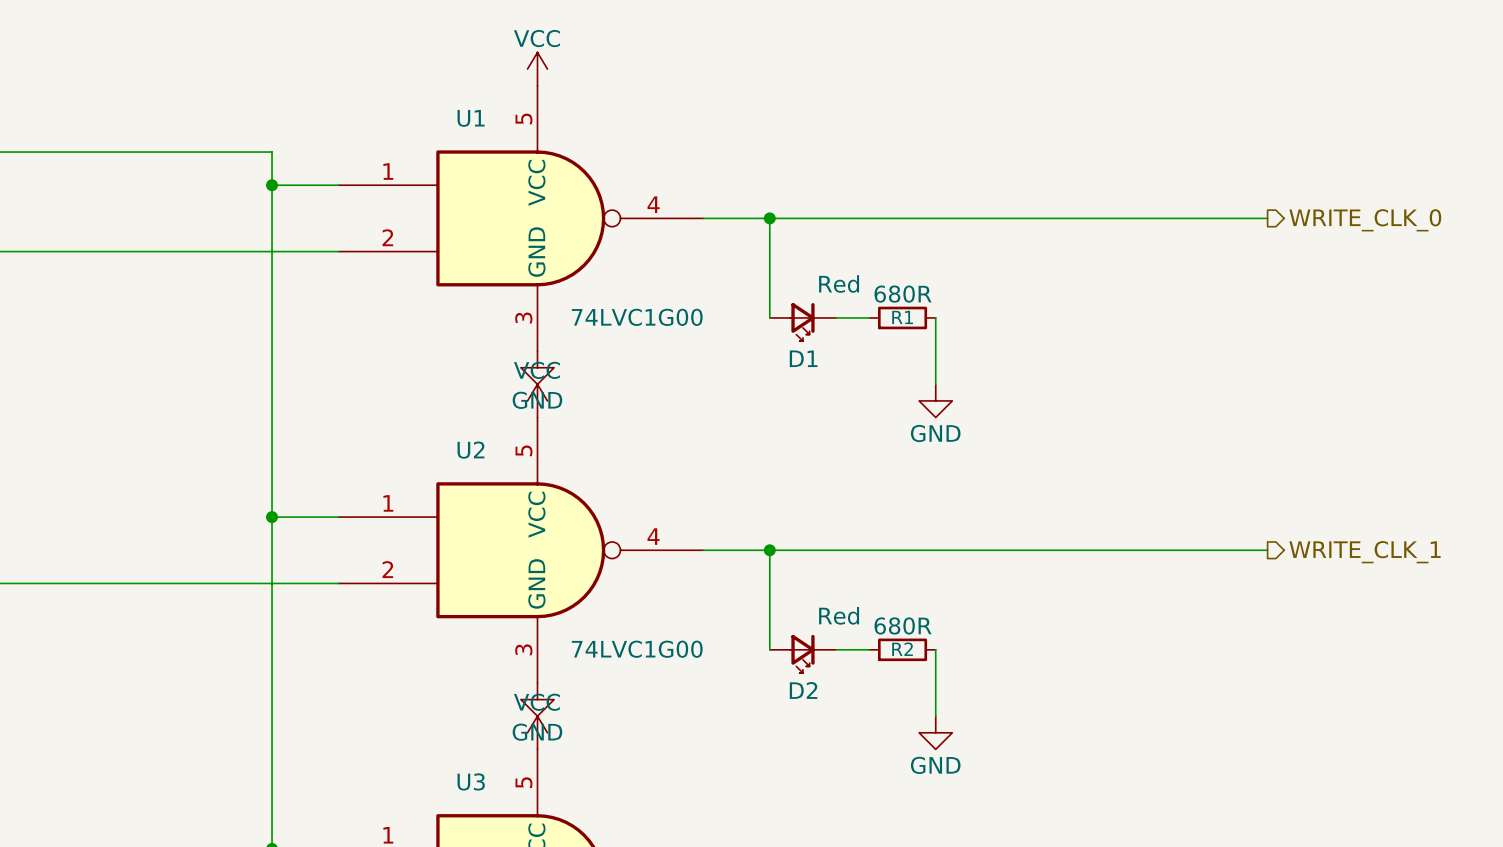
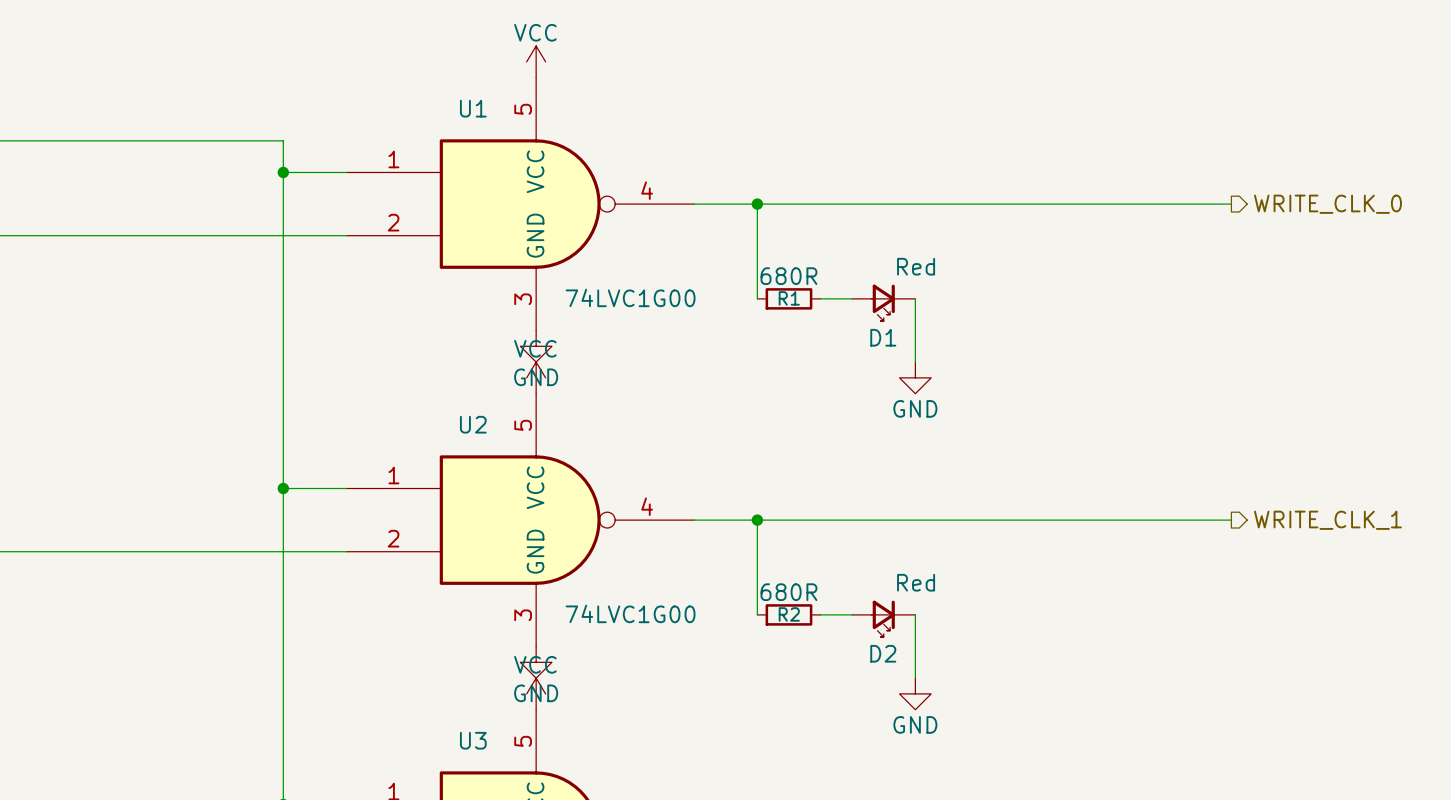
R1 position: (902, 317) -> (788, 298)
D1 position: (802, 322) -> (883, 302)
R2 position: (902, 649) -> (788, 614)
D2 position: (802, 653) -> (883, 618)

